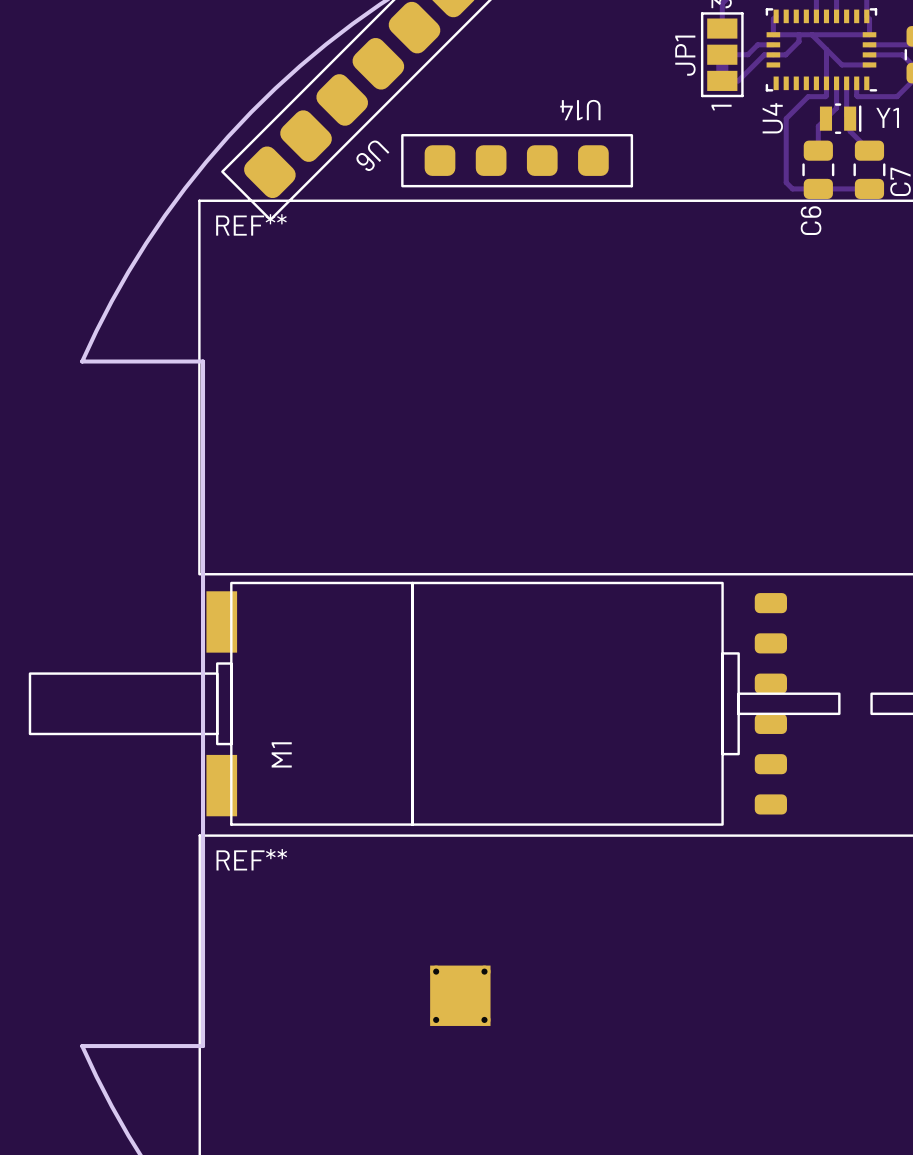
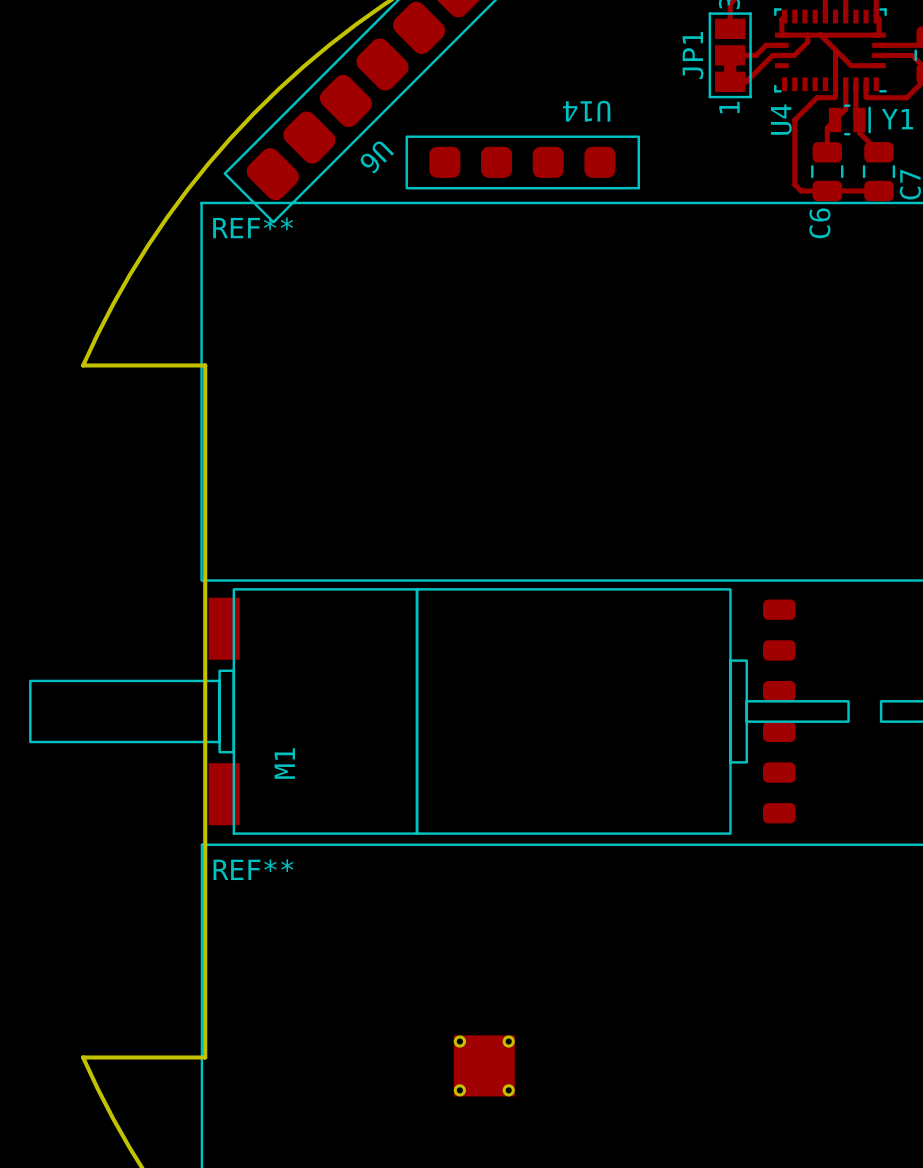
part position: (460, 995) -> (484, 1065)

